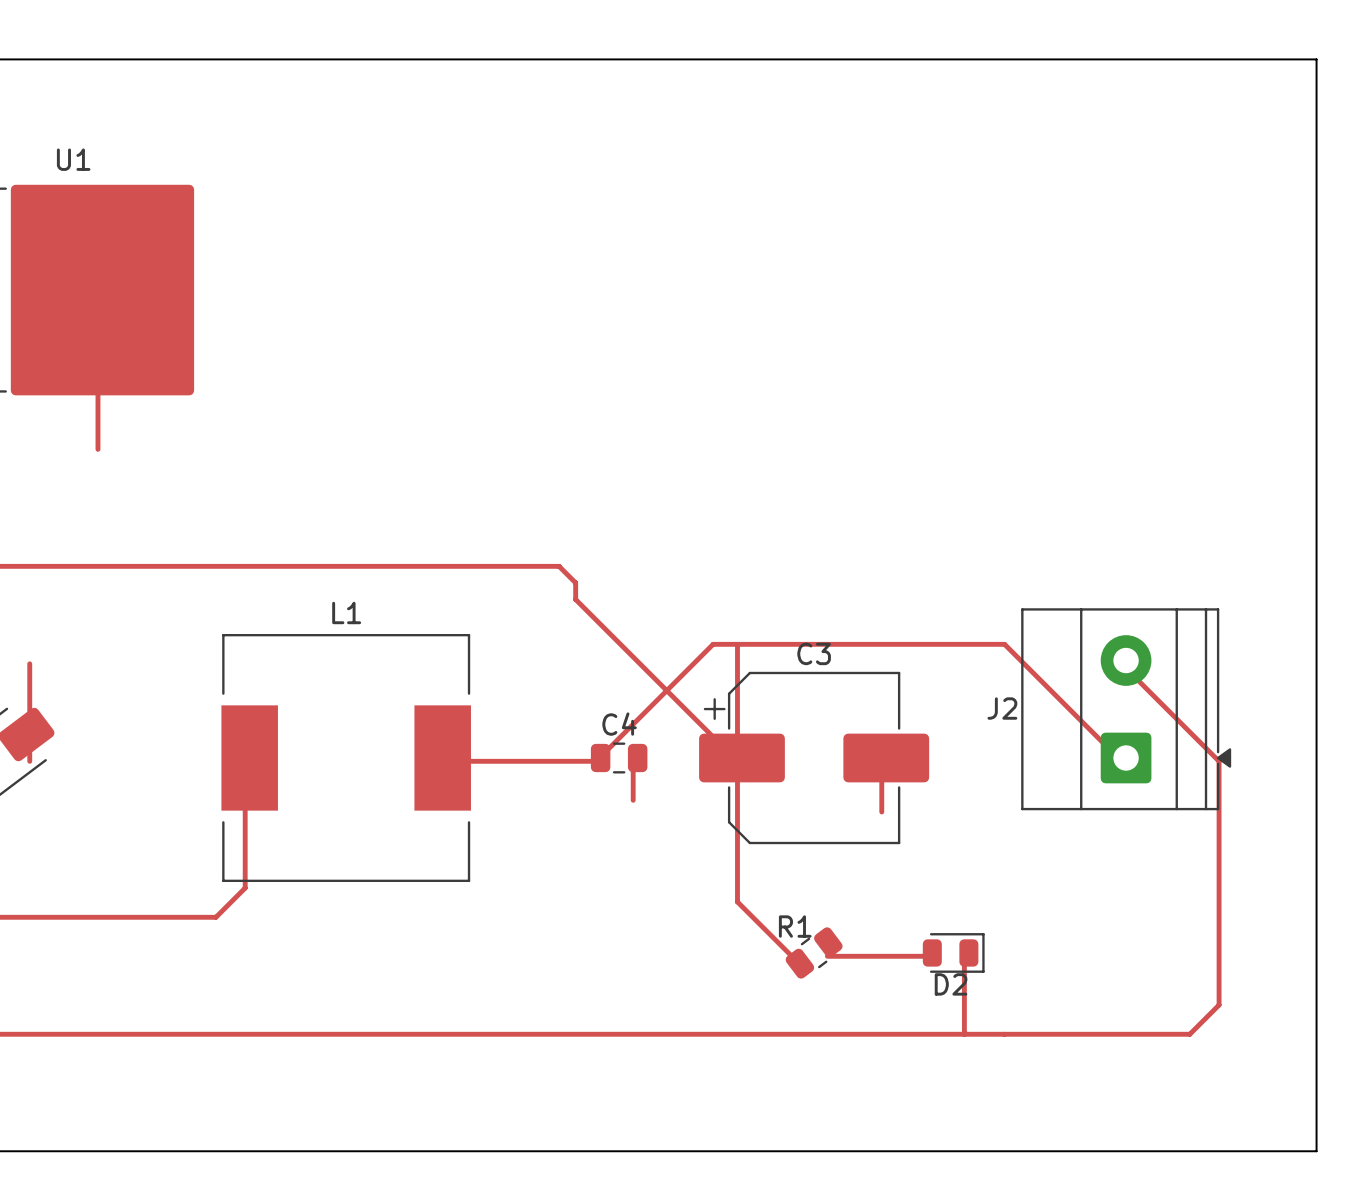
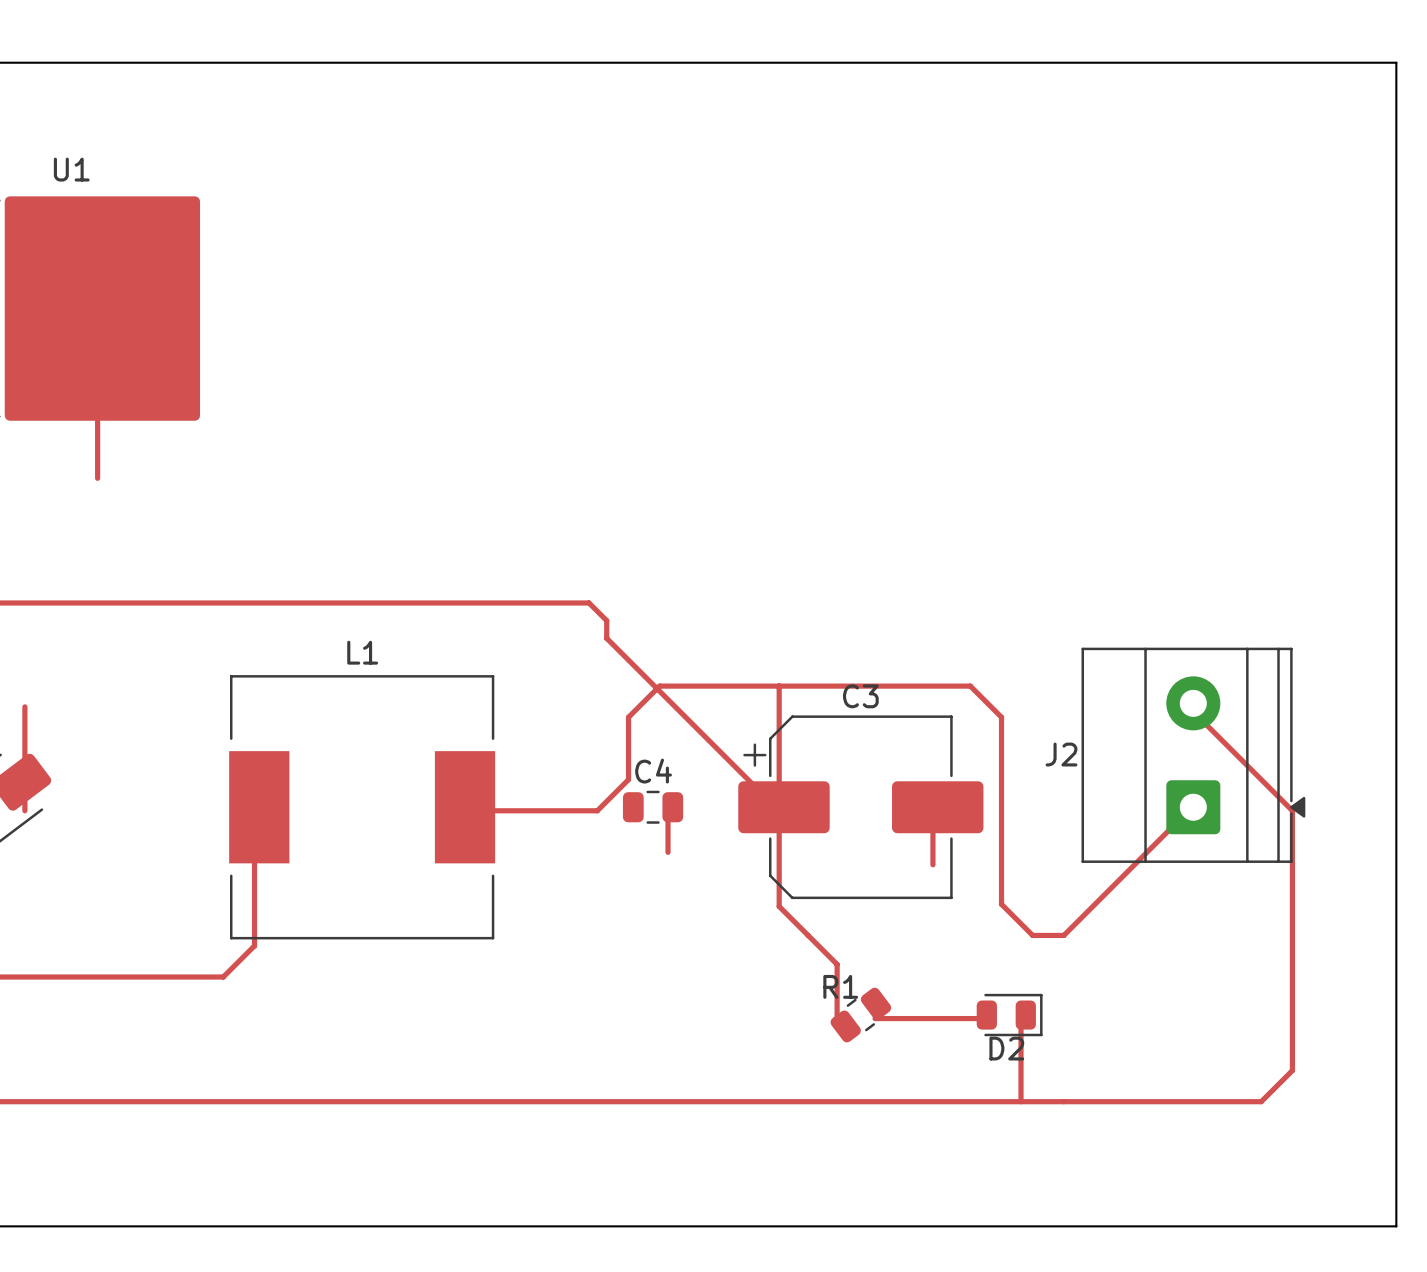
track: (713, 644) (596, 761) (566, 761) -> (753, 686) (659, 686) (628, 717) (628, 779) (597, 810)
track: (916, 644) (1004, 644) (1121, 761) -> (970, 686) (1001, 717) (1001, 904) (1032, 935) (1063, 935) (1188, 810)
track: (737, 851) (737, 901) (791, 956) -> (779, 906) (837, 964) (837, 1018)

